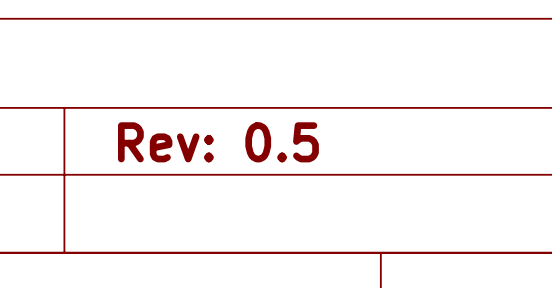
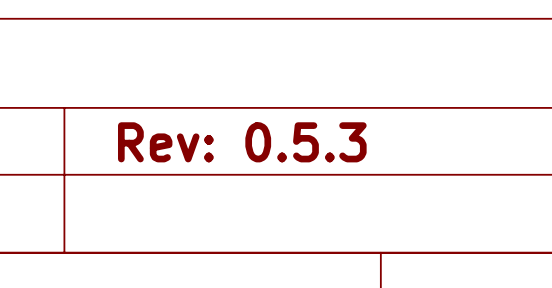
title block: Rev: 0.5 (218, 142) -> Rev: 0.5.3 (242, 142)

